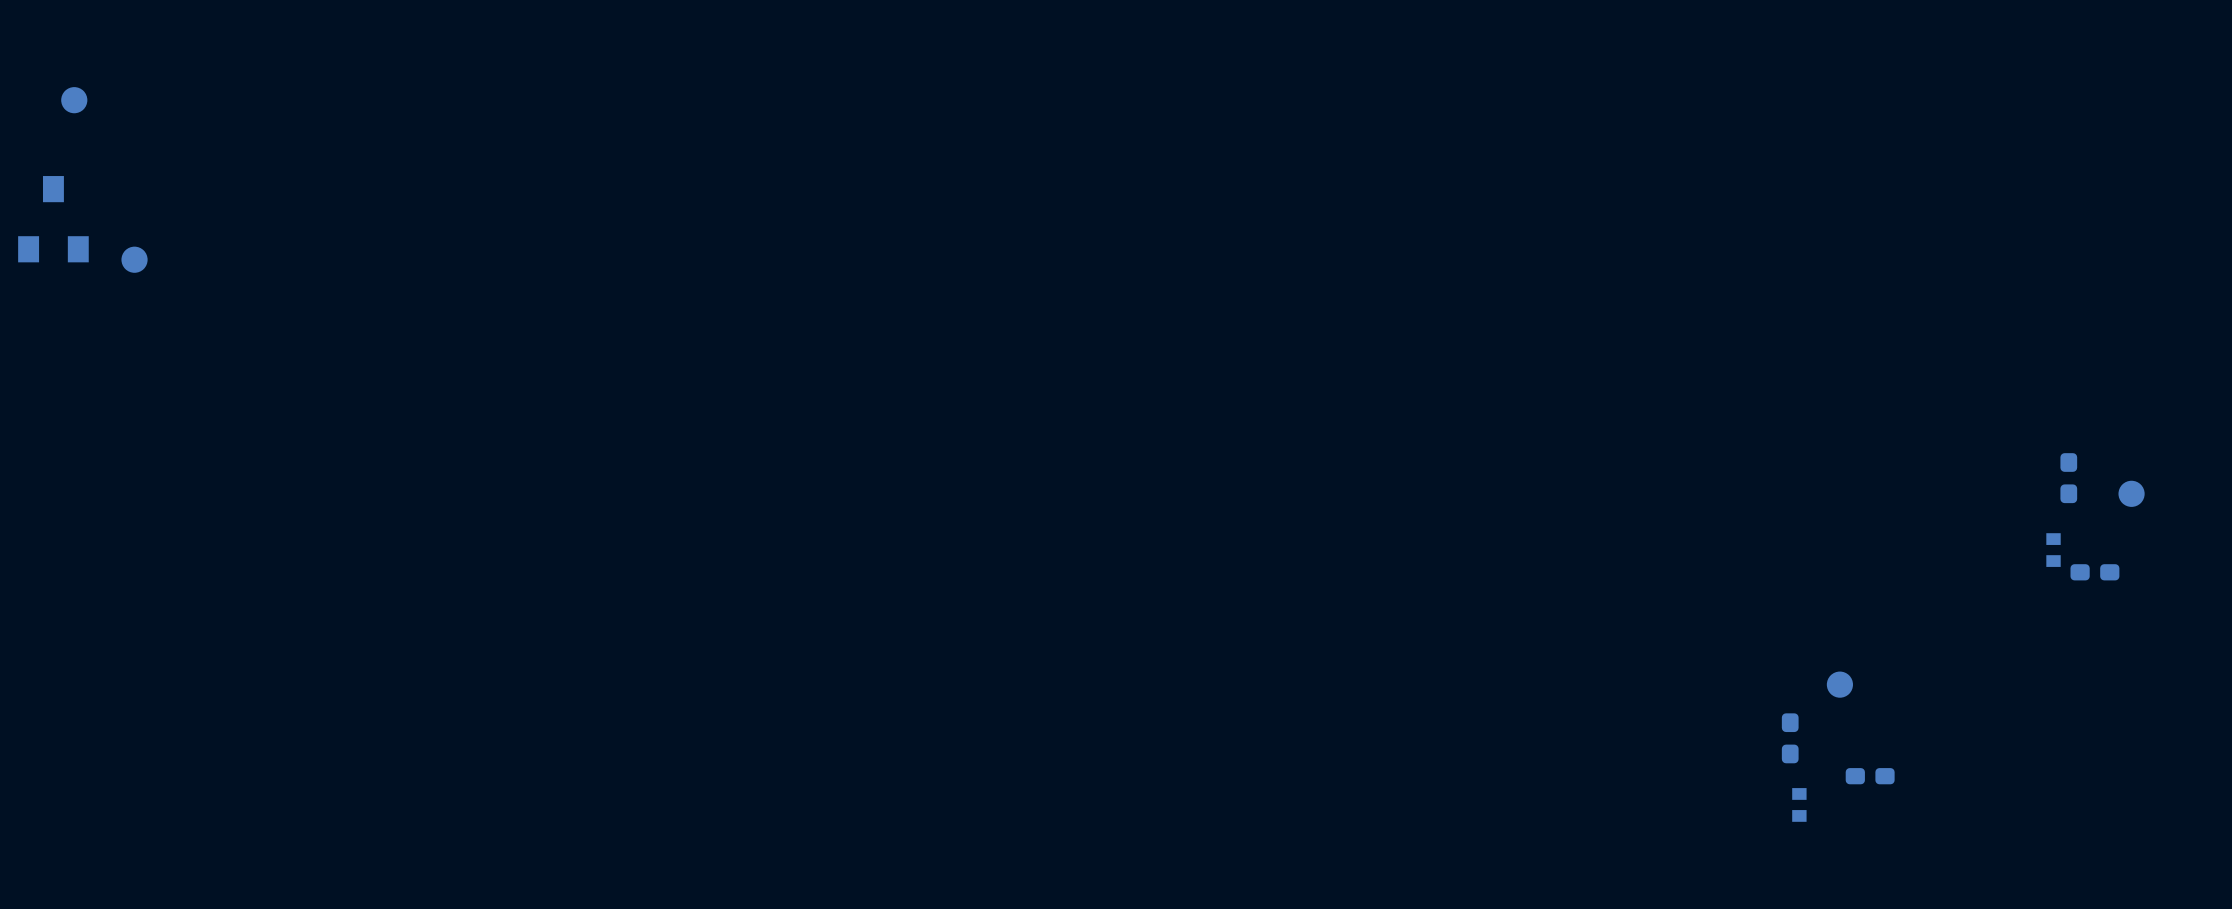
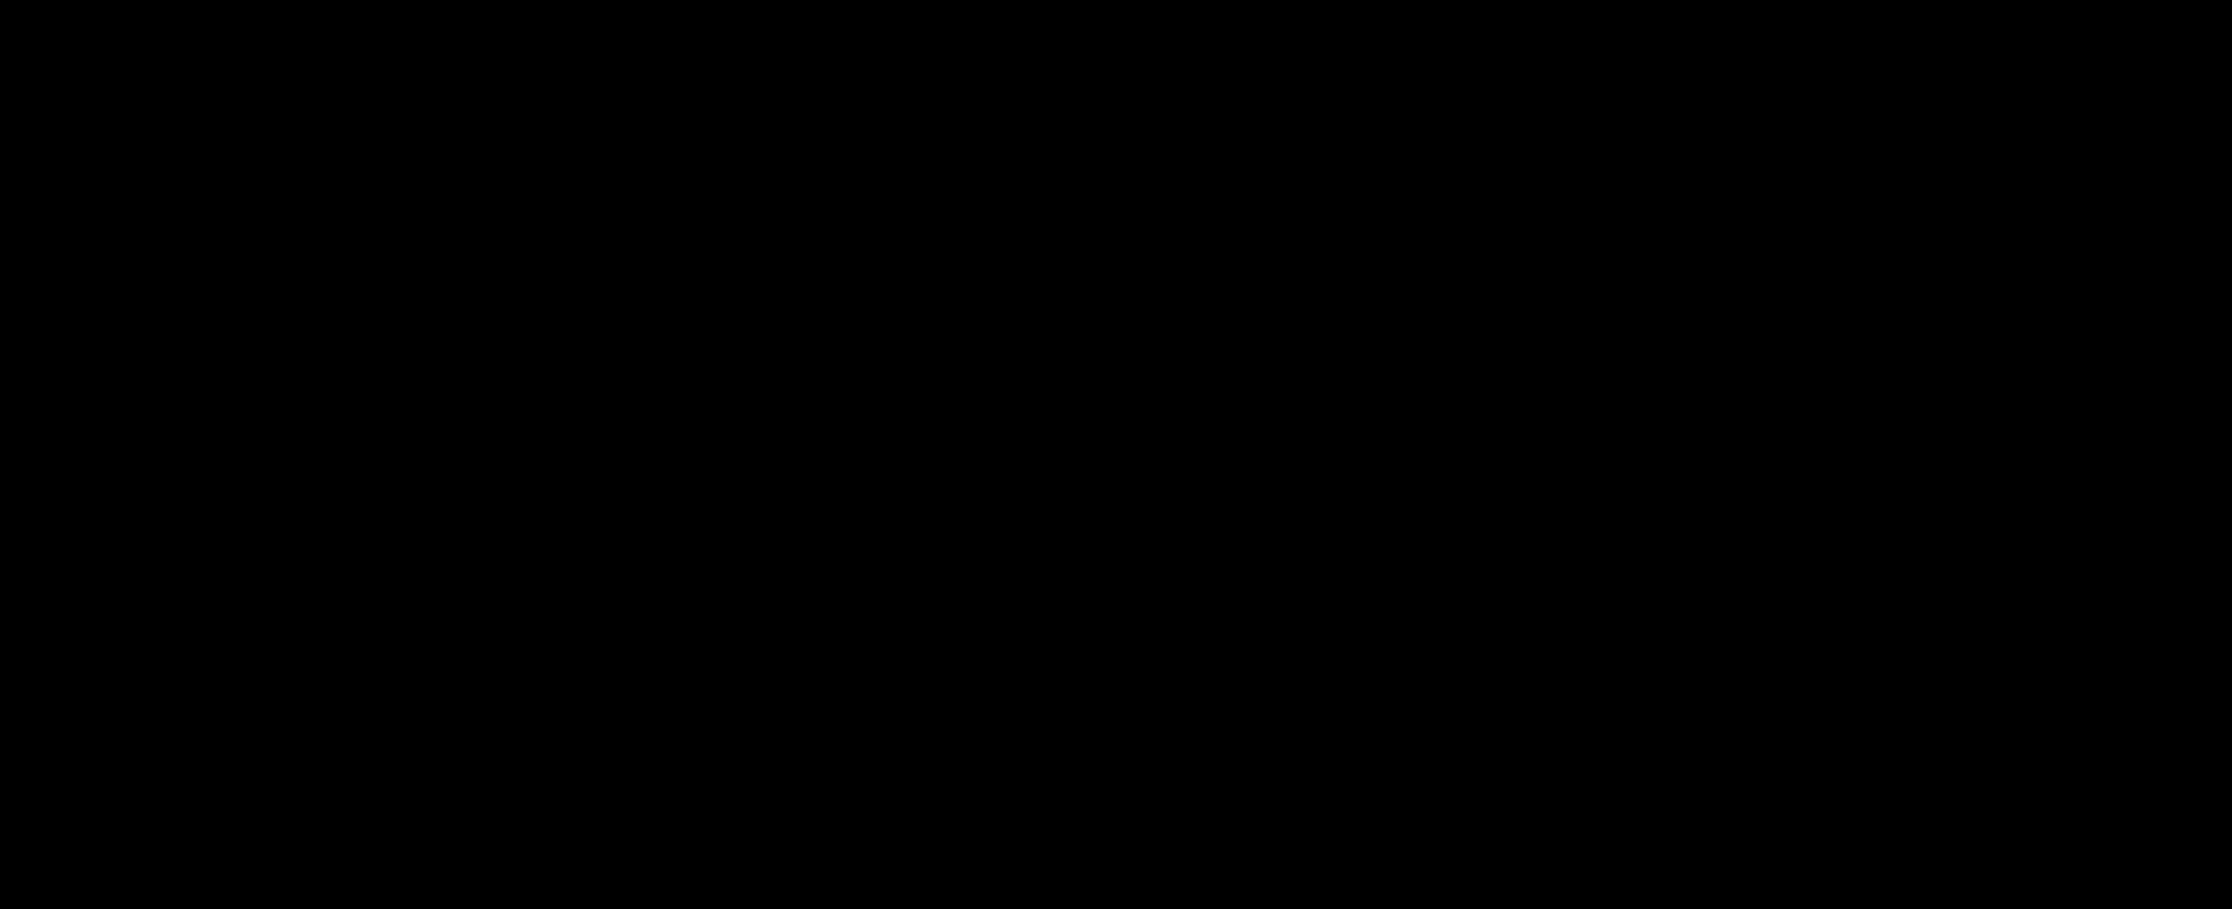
part: (74, 100) -> none
part: (53, 219) -> none
part: (134, 259) -> none
part: (2068, 478) -> none
part: (2131, 493) -> none
part: (2053, 550) -> none
part: (2094, 572) -> none
part: (1839, 684) -> none
part: (1790, 738) -> none
part: (1870, 776) -> none
part: (1799, 804) -> none

